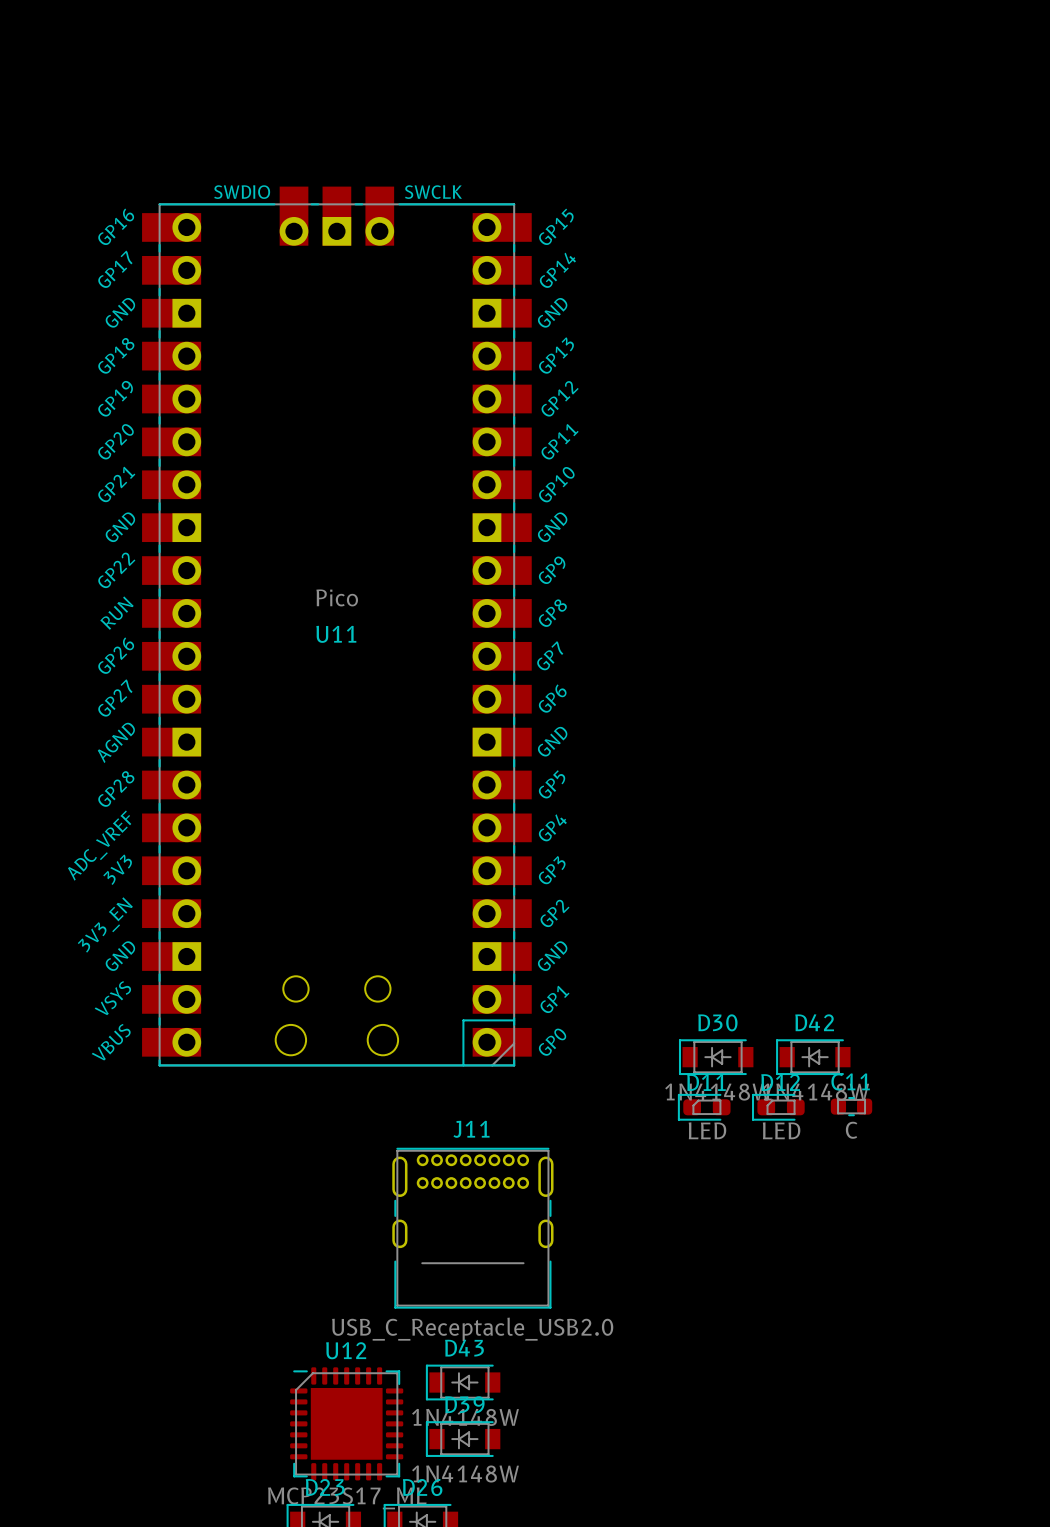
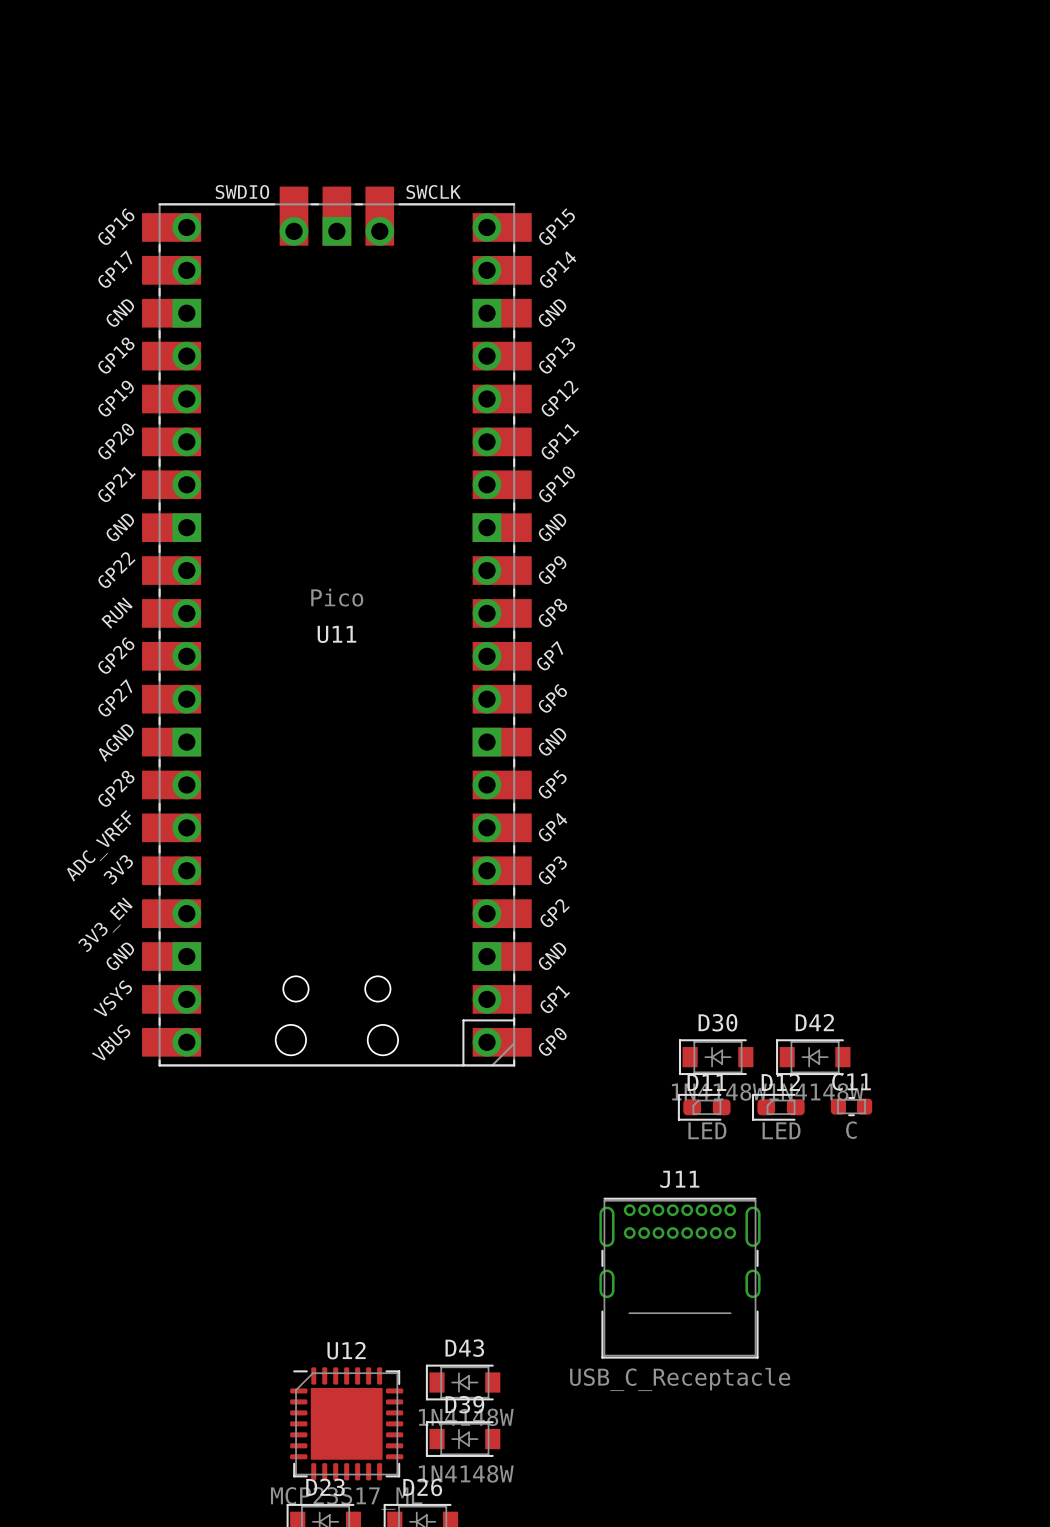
J11 position: (472, 1228) -> (679, 1278)
J11 value: USB_C_Receptacle_USB2.0 (472, 1329) -> USB_C_Receptacle (680, 1379)

